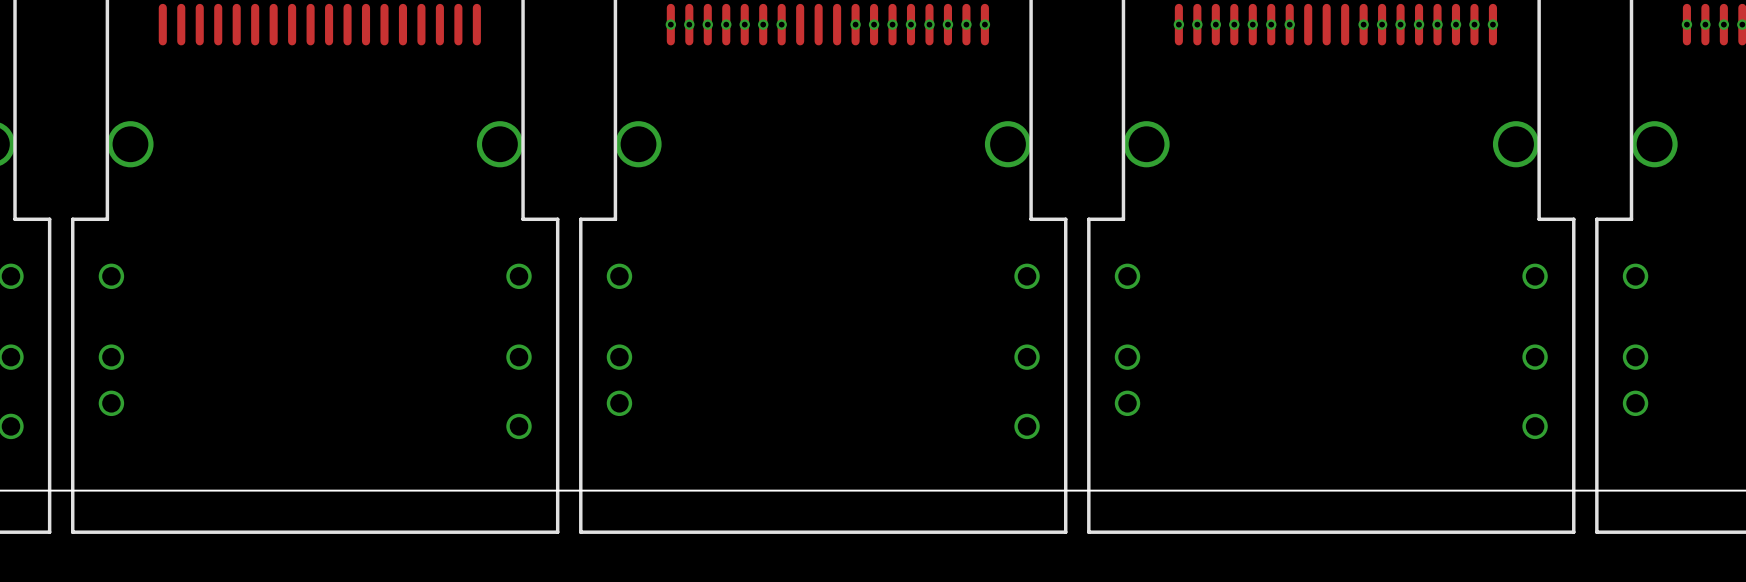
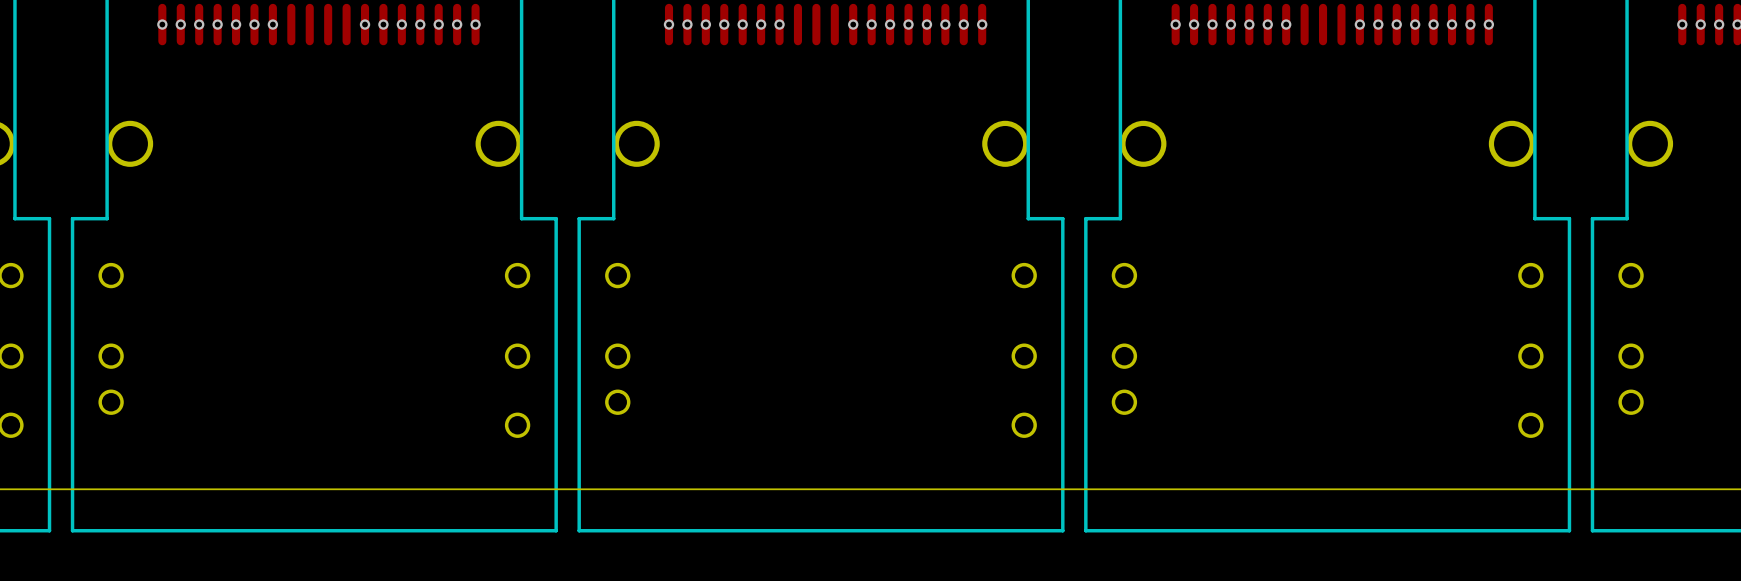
via: none -> (162, 24)
via: none -> (180, 24)
via: none -> (199, 24)
via: none -> (217, 24)
via: none -> (236, 24)
via: none -> (254, 24)
via: none -> (272, 24)
via: none -> (365, 24)
via: none -> (383, 24)
via: none -> (401, 24)
via: none -> (420, 24)
via: none -> (438, 24)
via: none -> (457, 24)
via: none -> (475, 24)

